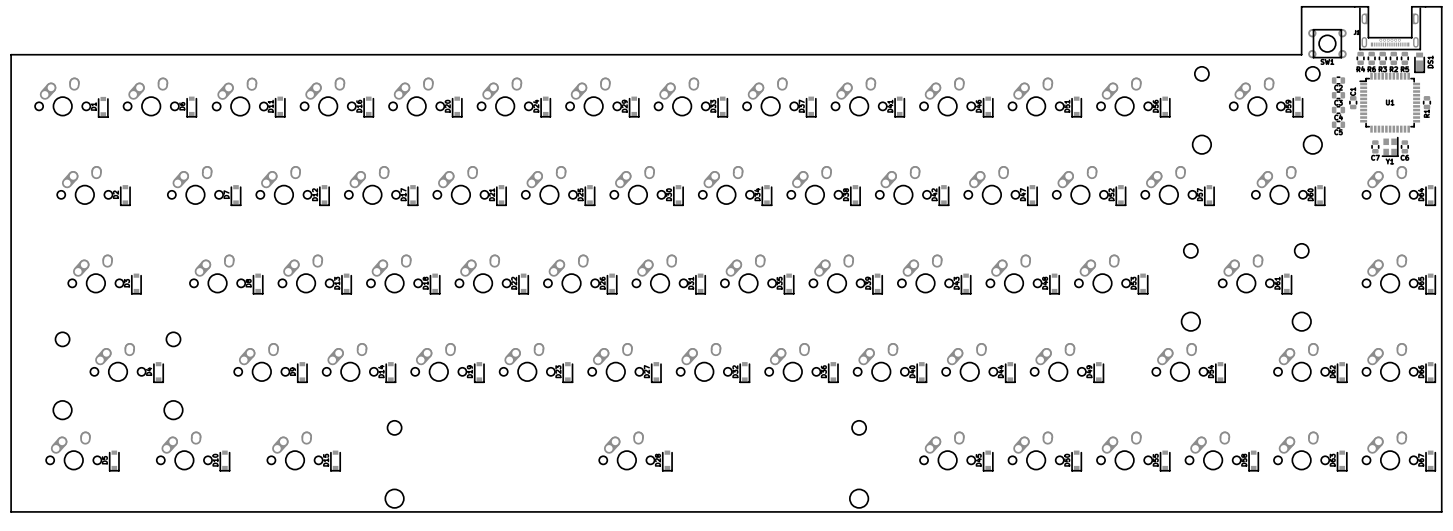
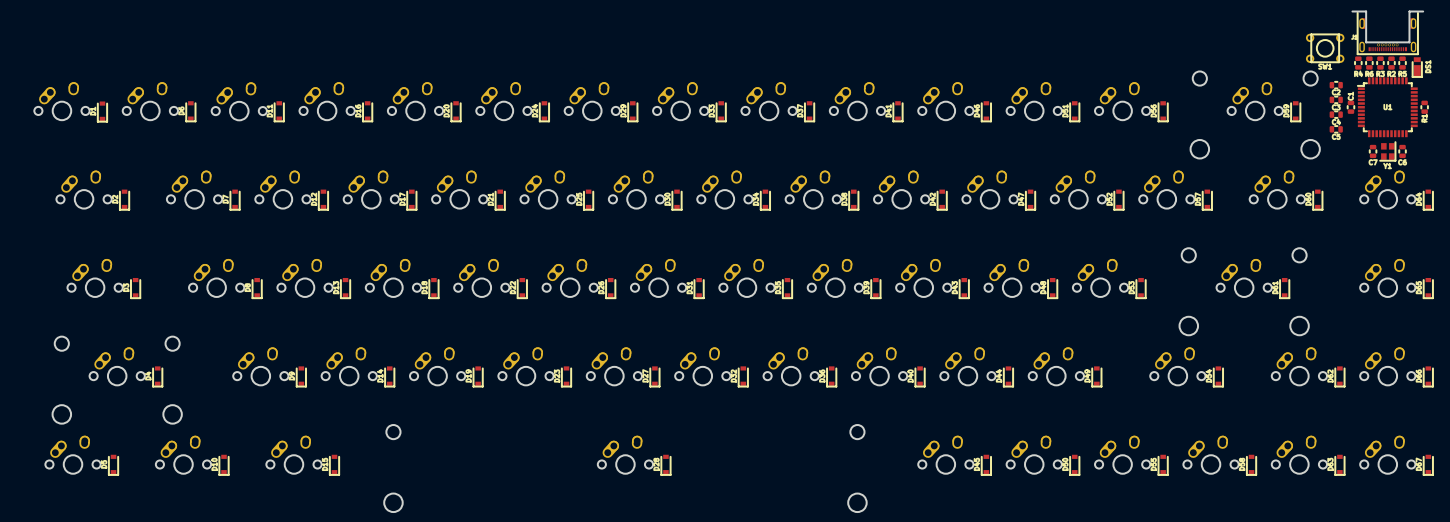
board edge: (1354, 6) (1301, 6) (1301, 54) (11, 54) (11, 511) (1441, 511) (1441, 6) (1425, 6) -> none

